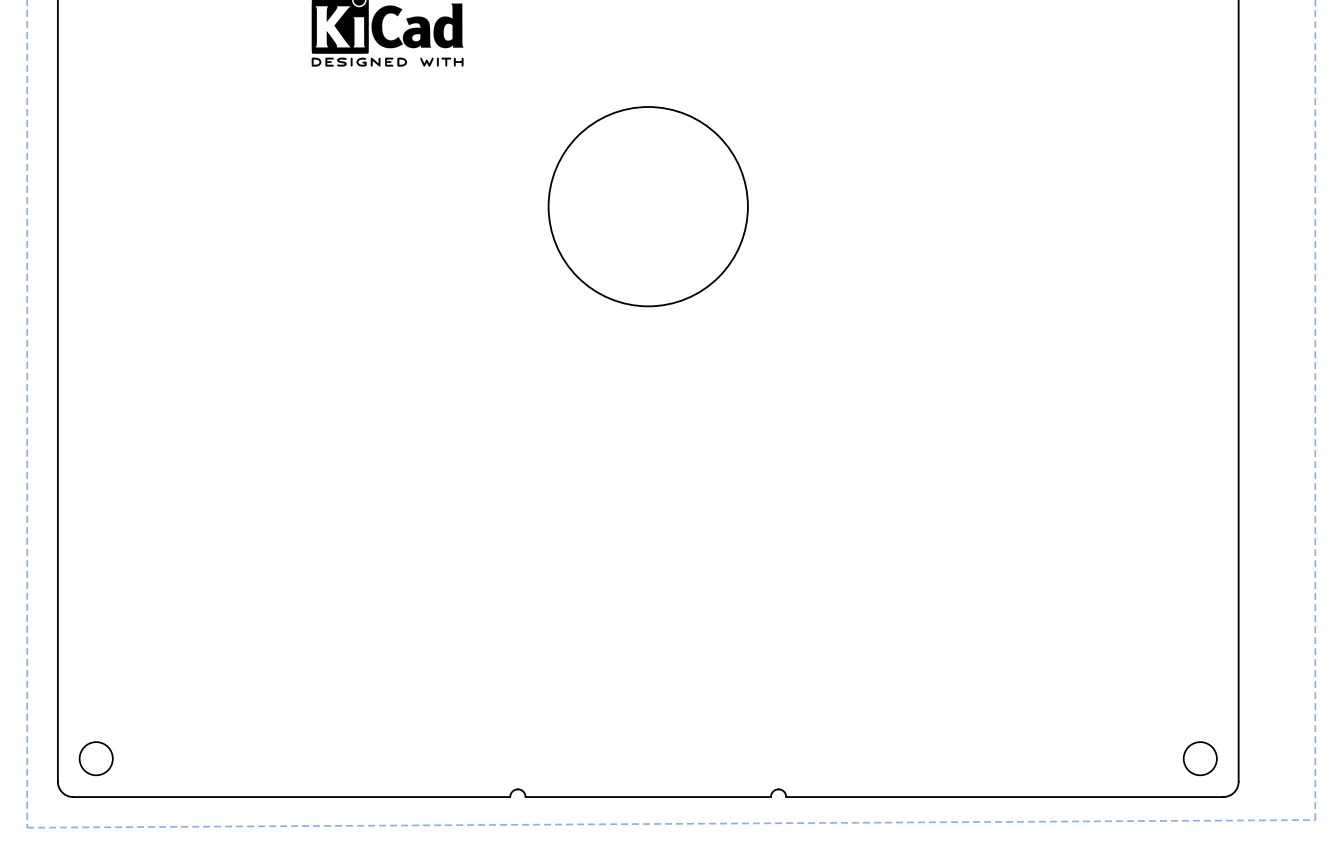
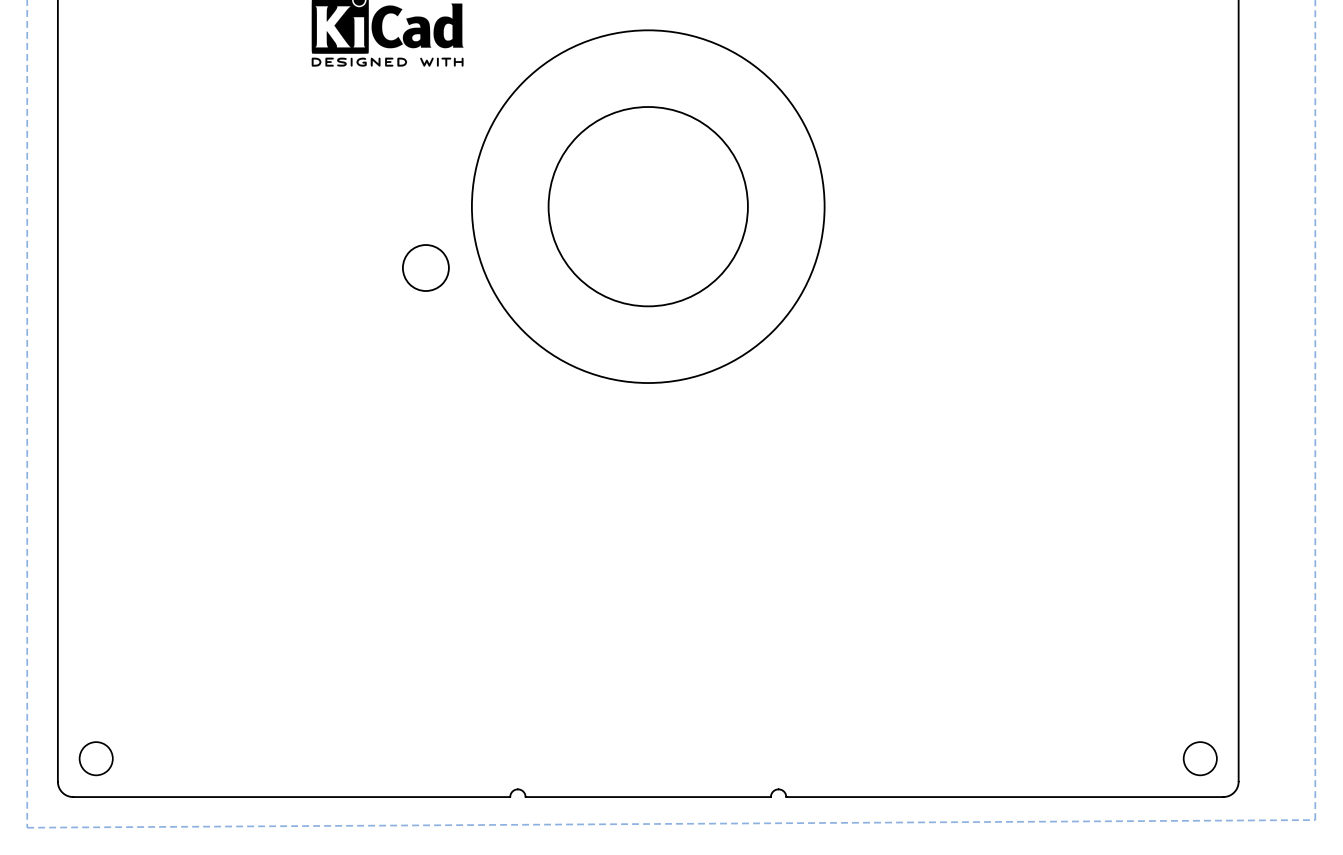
drawing: none -> [471, 29, 826, 384]
drawing: none -> [402, 244, 450, 292]

